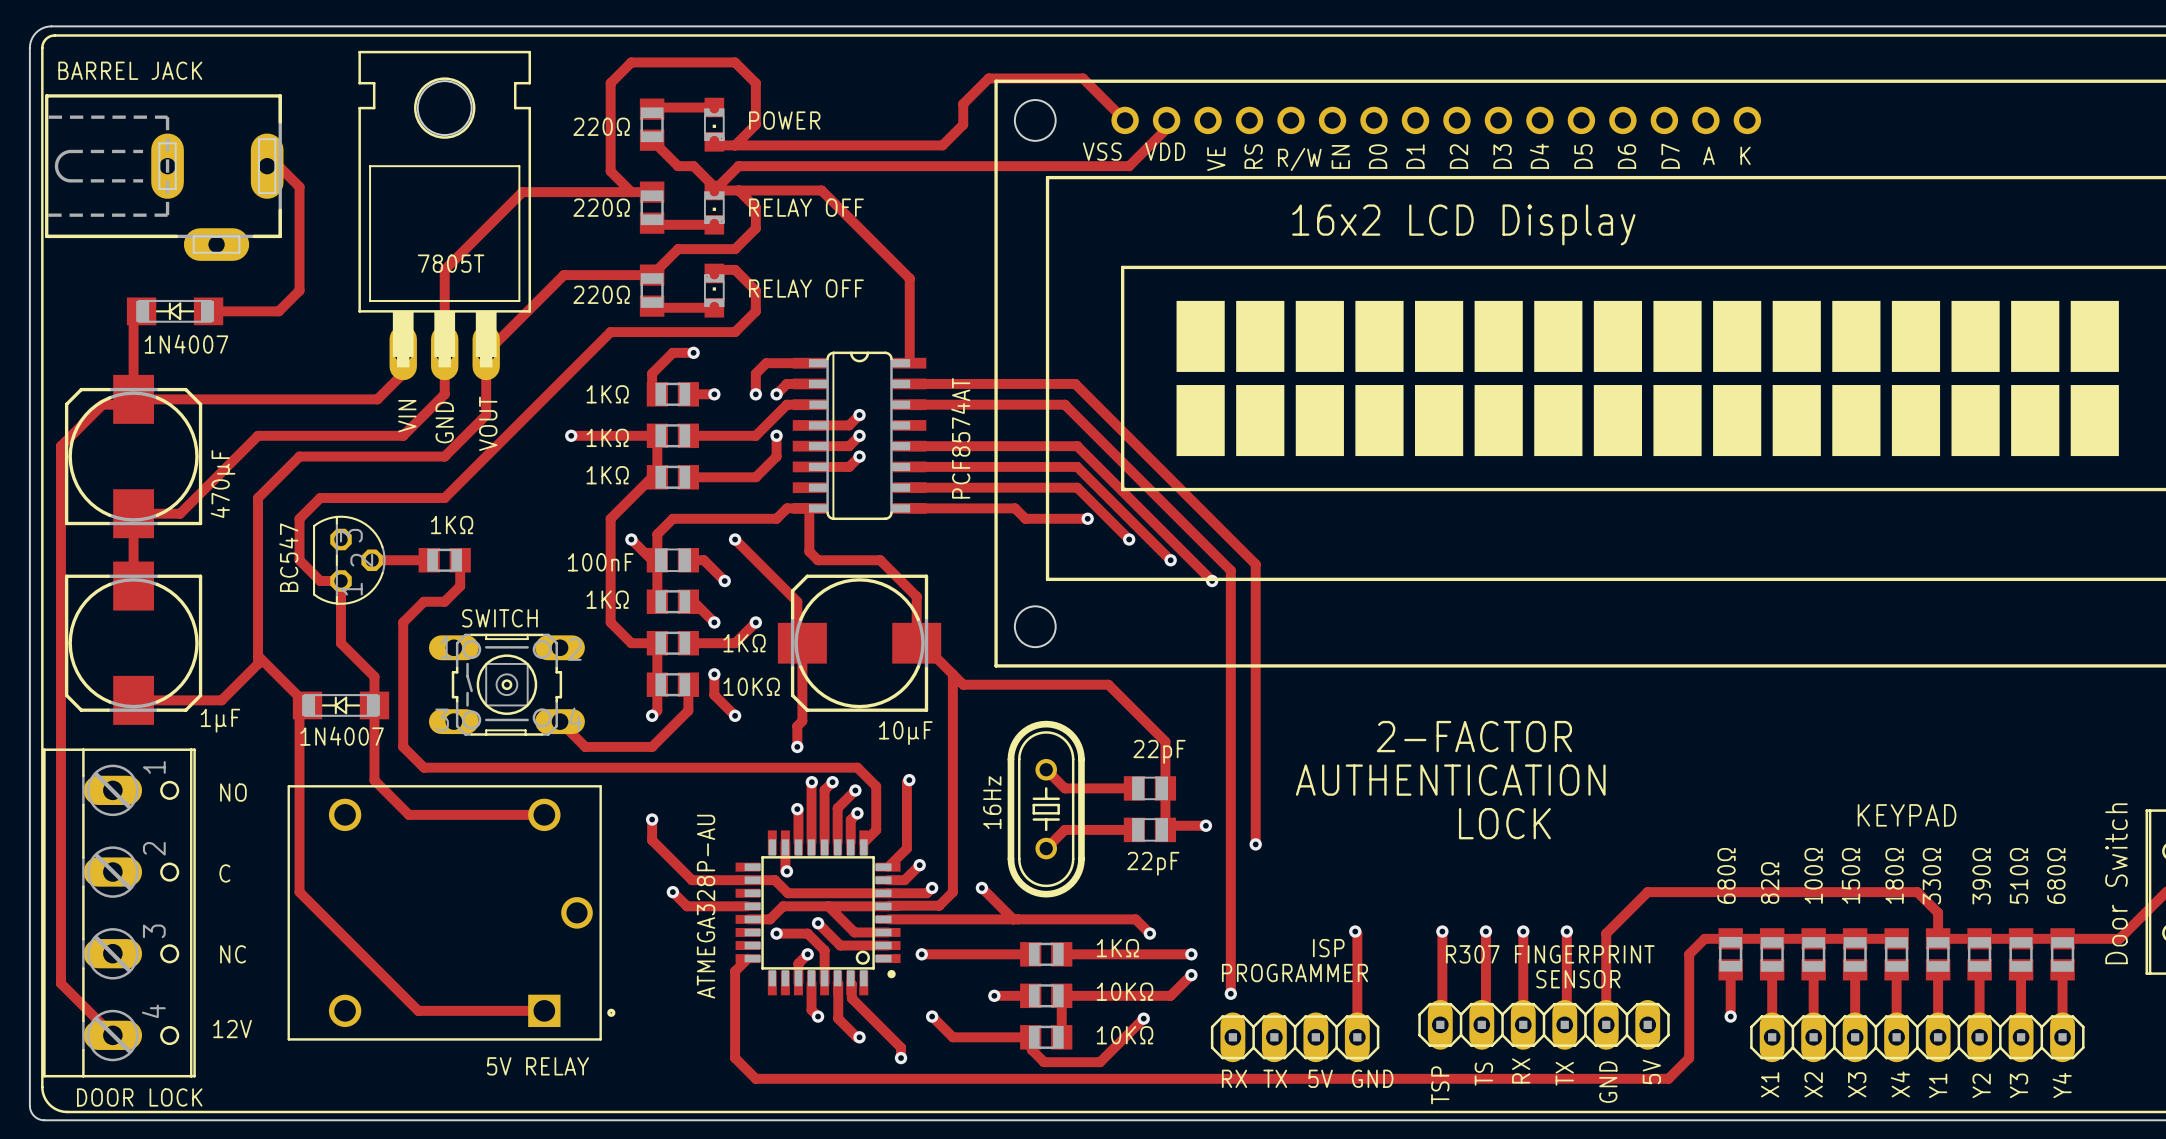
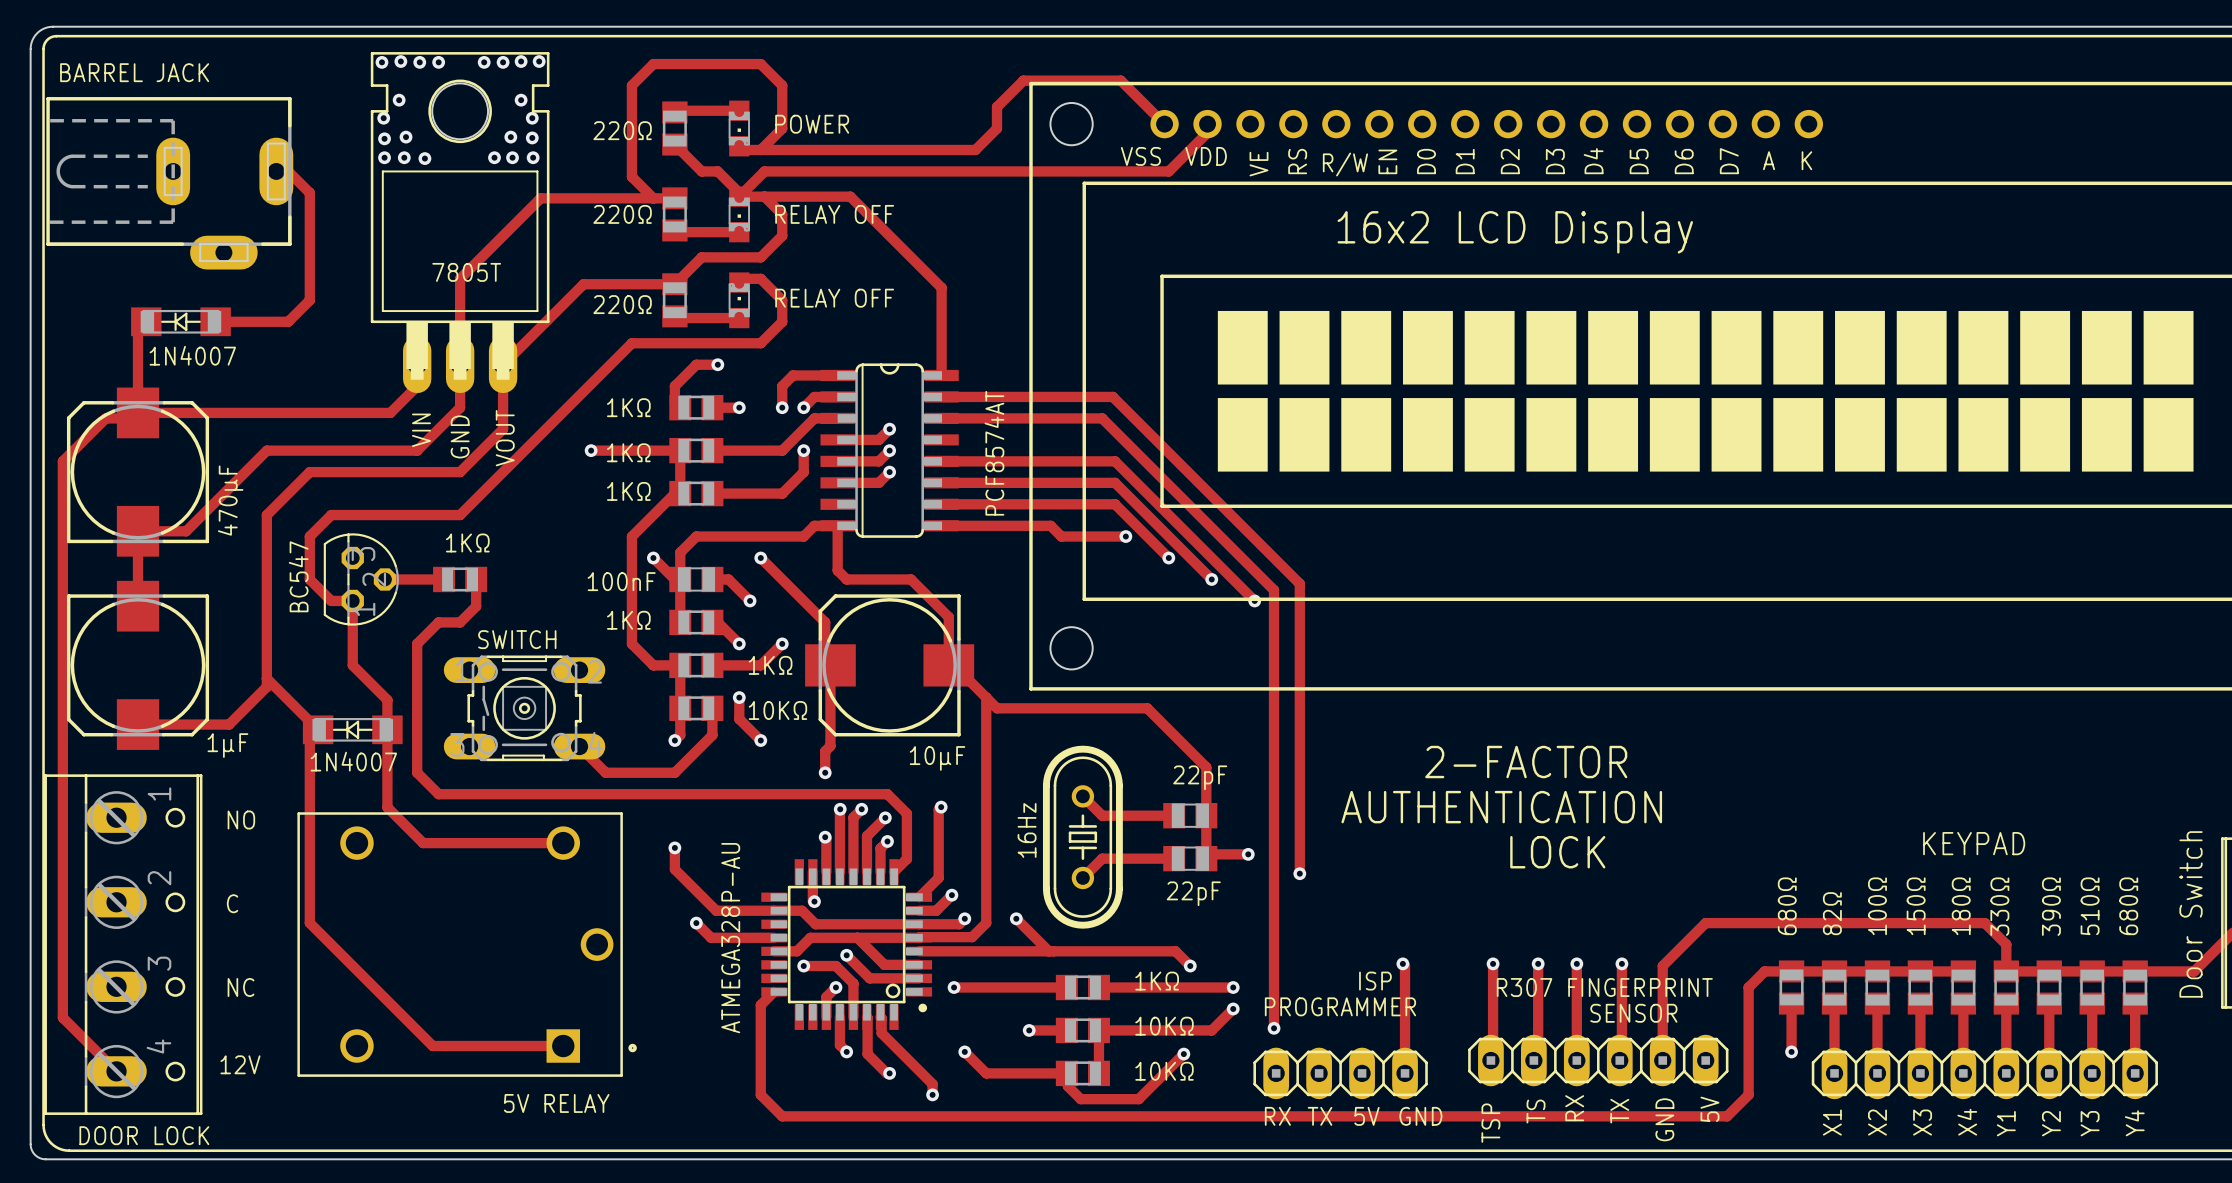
via: none -> (400, 61)
via: none -> (521, 61)
via: none -> (539, 61)
via: none -> (381, 62)
via: none -> (419, 62)
via: none -> (438, 62)
via: none -> (484, 62)
via: none -> (503, 62)
via: none -> (399, 100)
via: none -> (521, 100)
via: none -> (383, 118)
via: none -> (532, 118)
via: none -> (406, 137)
via: none -> (510, 137)
via: none -> (532, 137)
via: none -> (384, 138)
via: none -> (384, 157)
via: none -> (404, 157)
via: none -> (494, 157)
via: none -> (512, 157)
via: none -> (533, 157)
via: none -> (424, 158)

